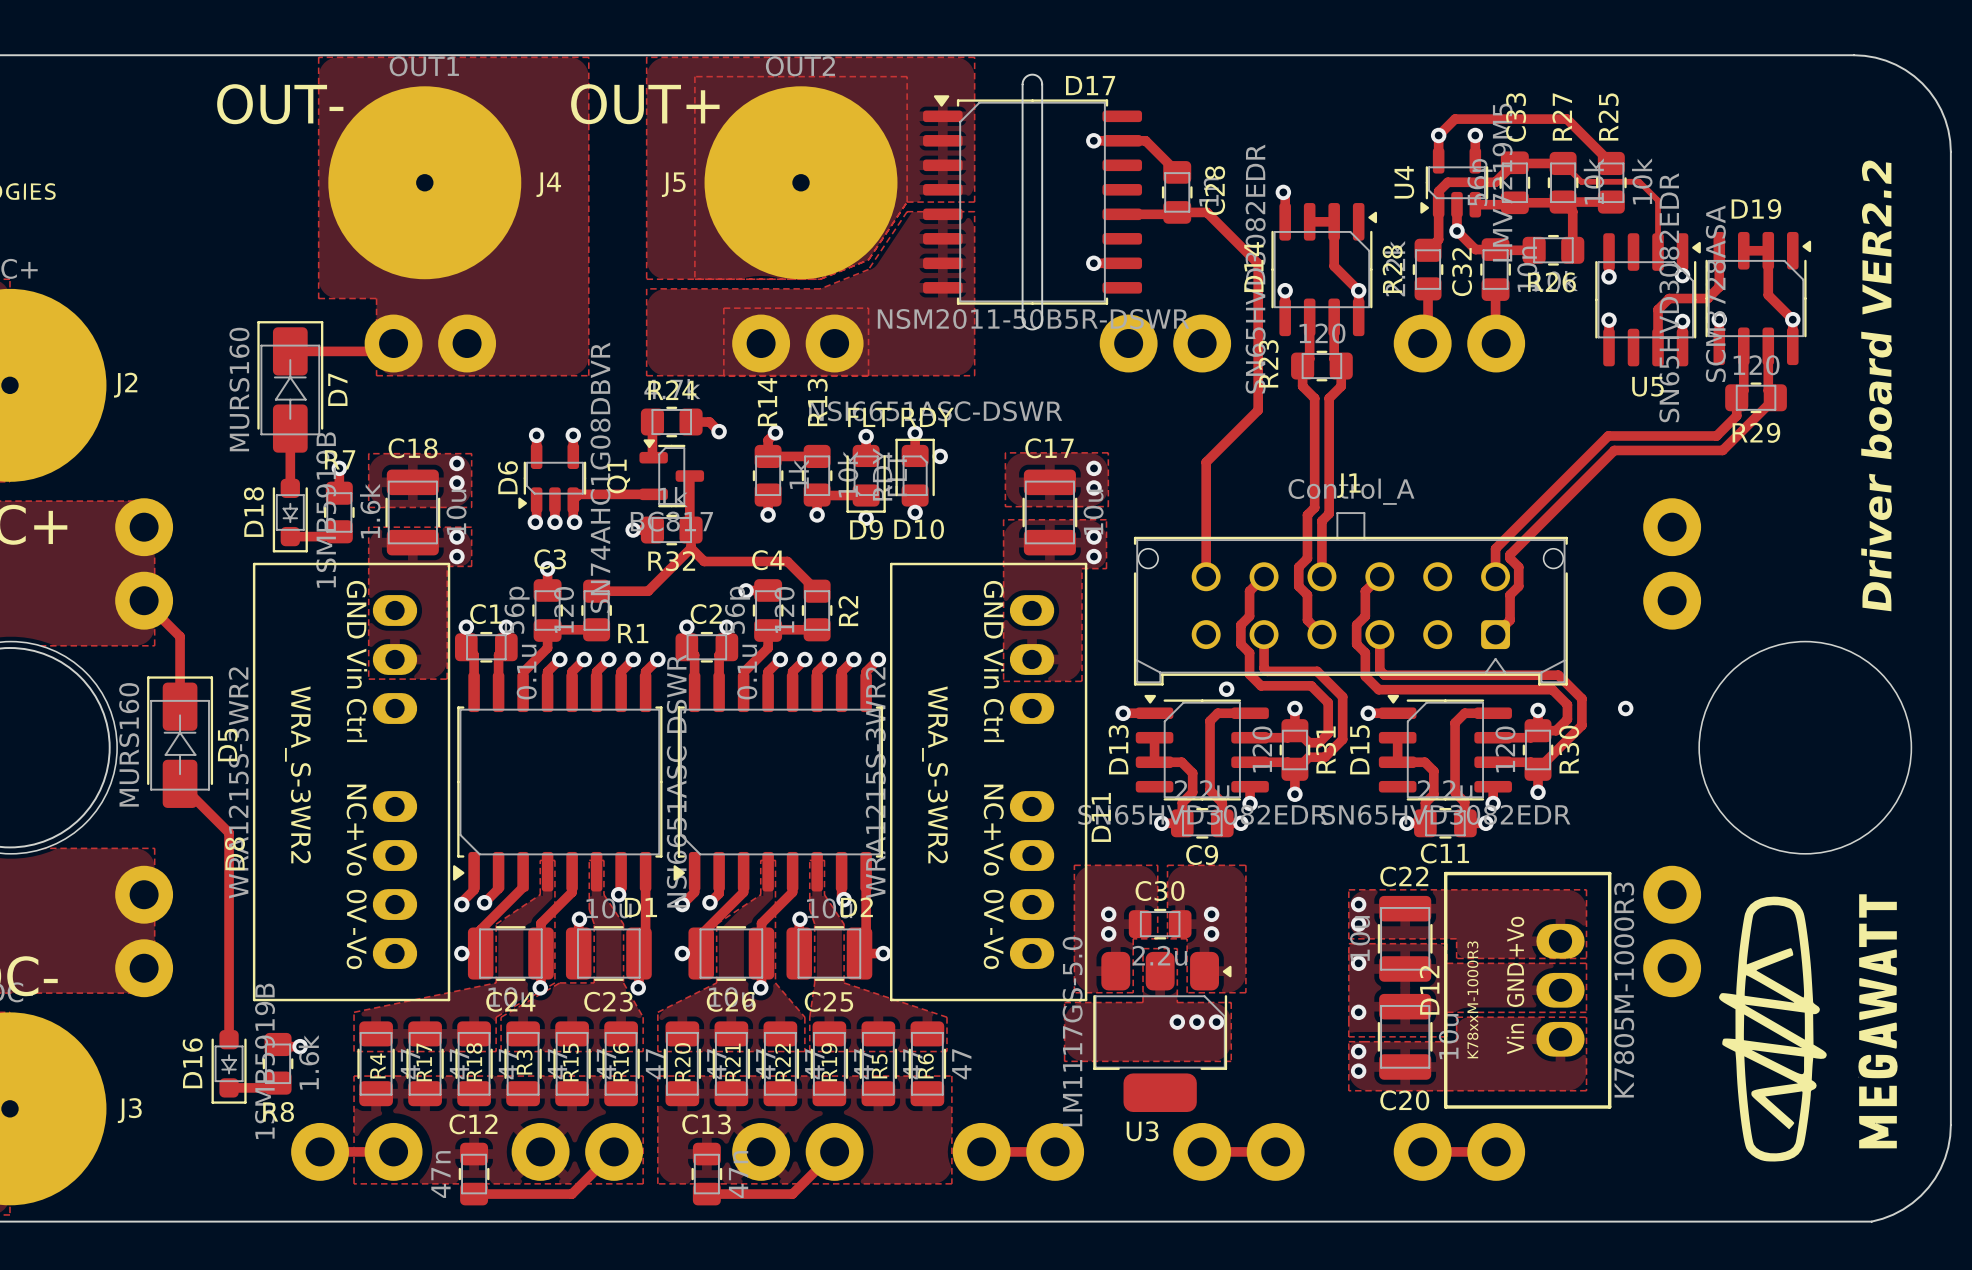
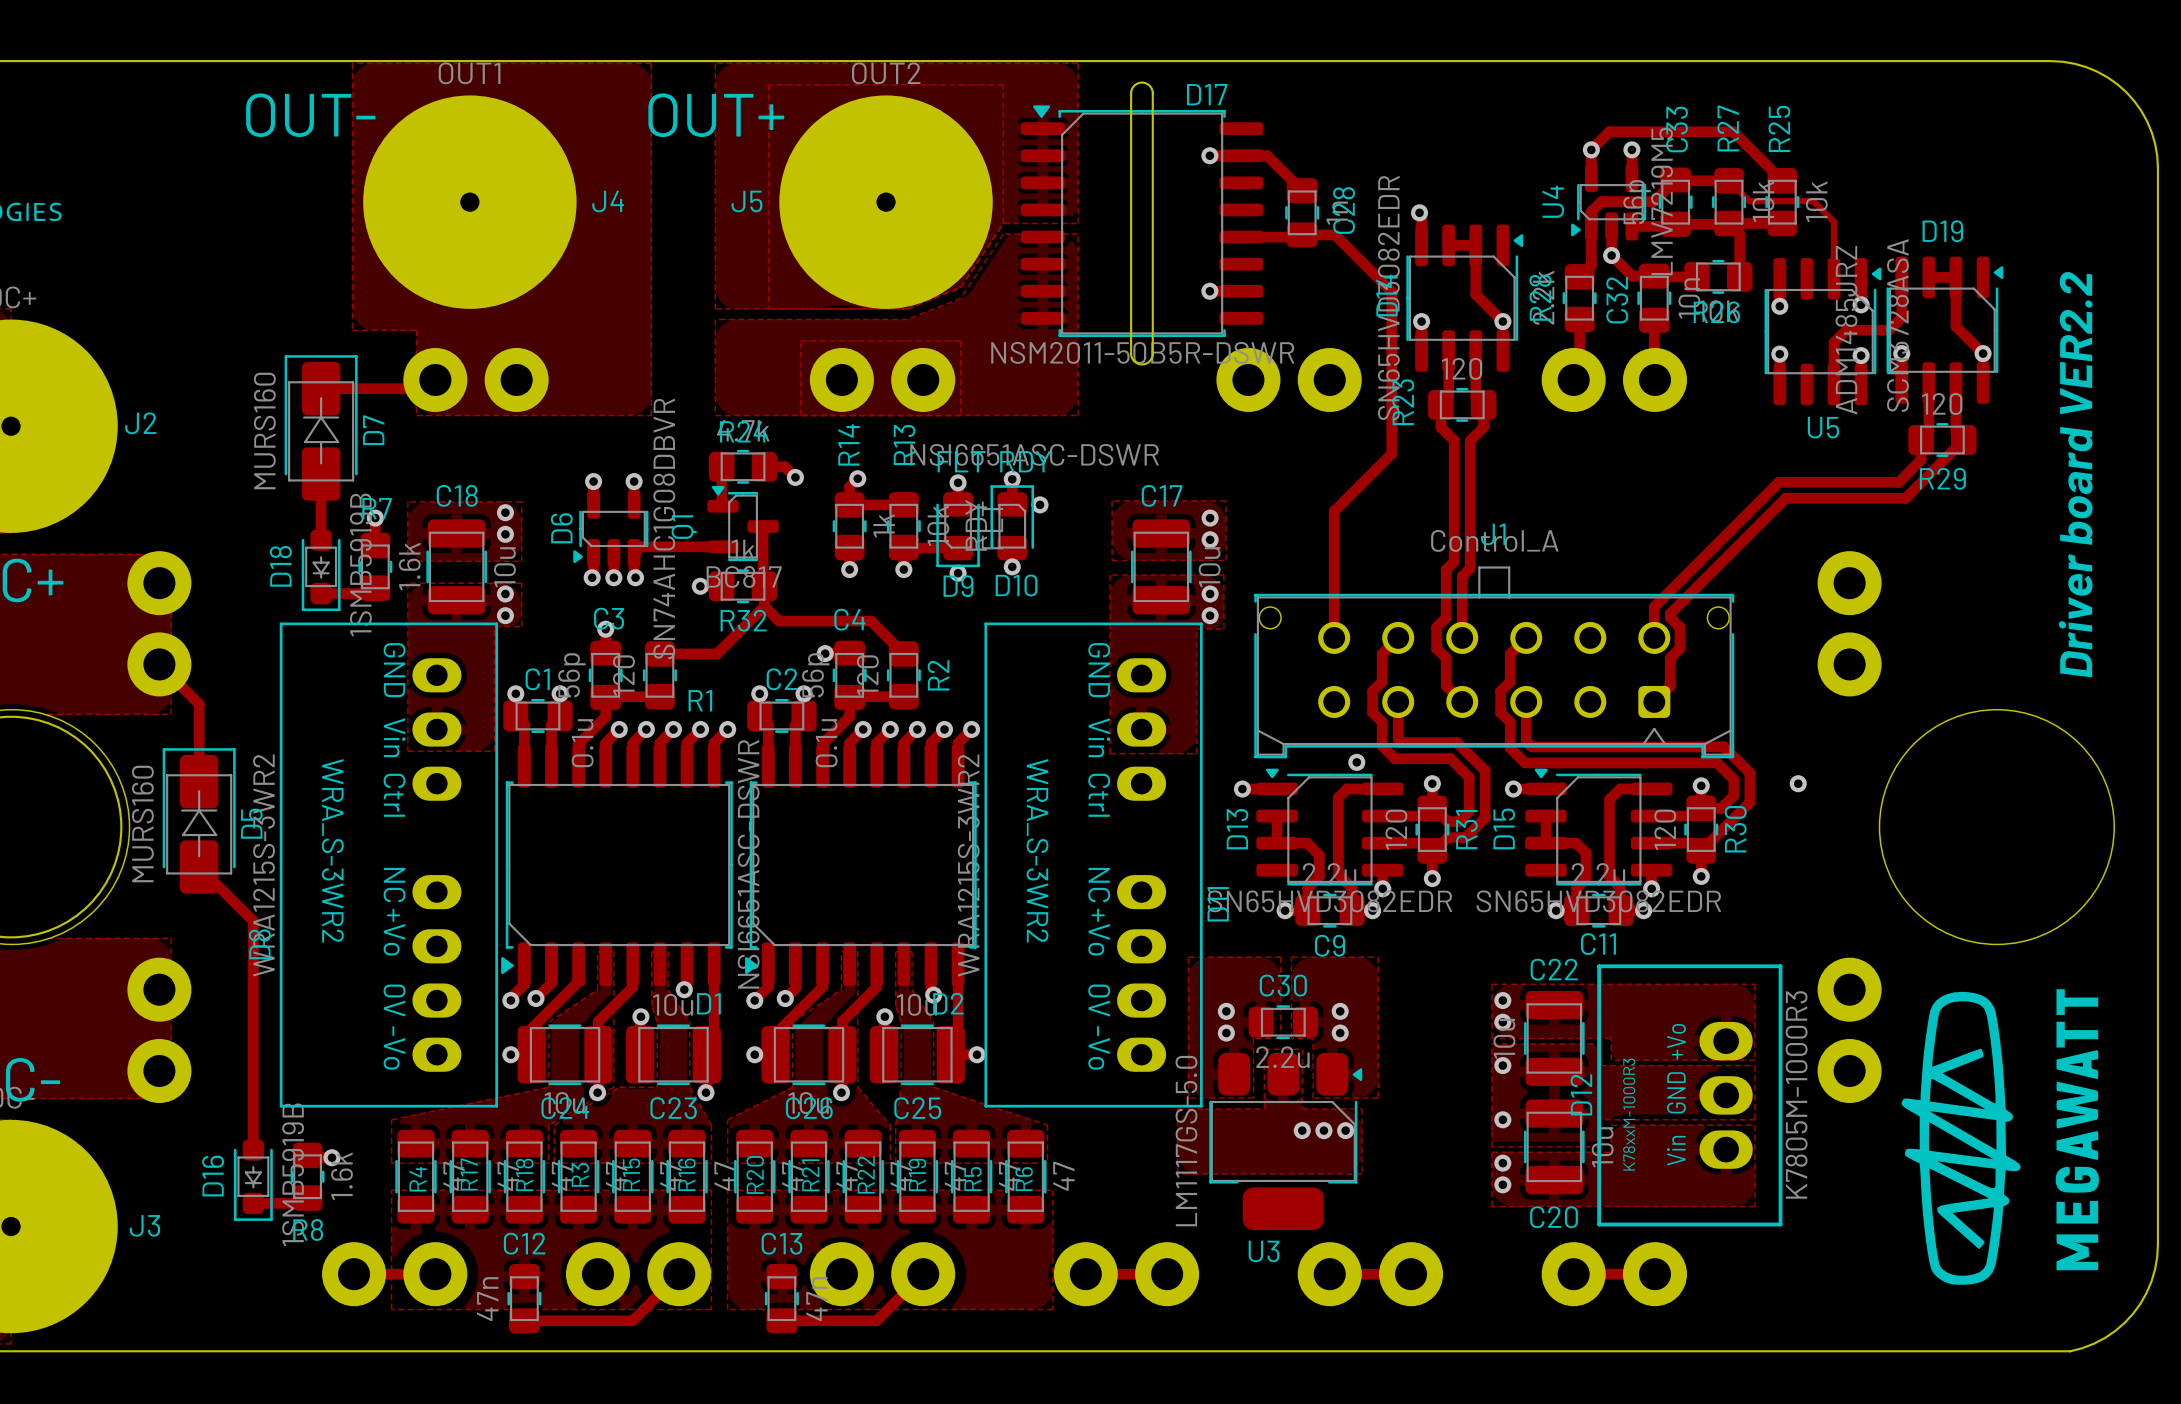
D19 value: SN65HVD3082EDR (1669, 297) -> ADM1485JRZ (1846, 330)

